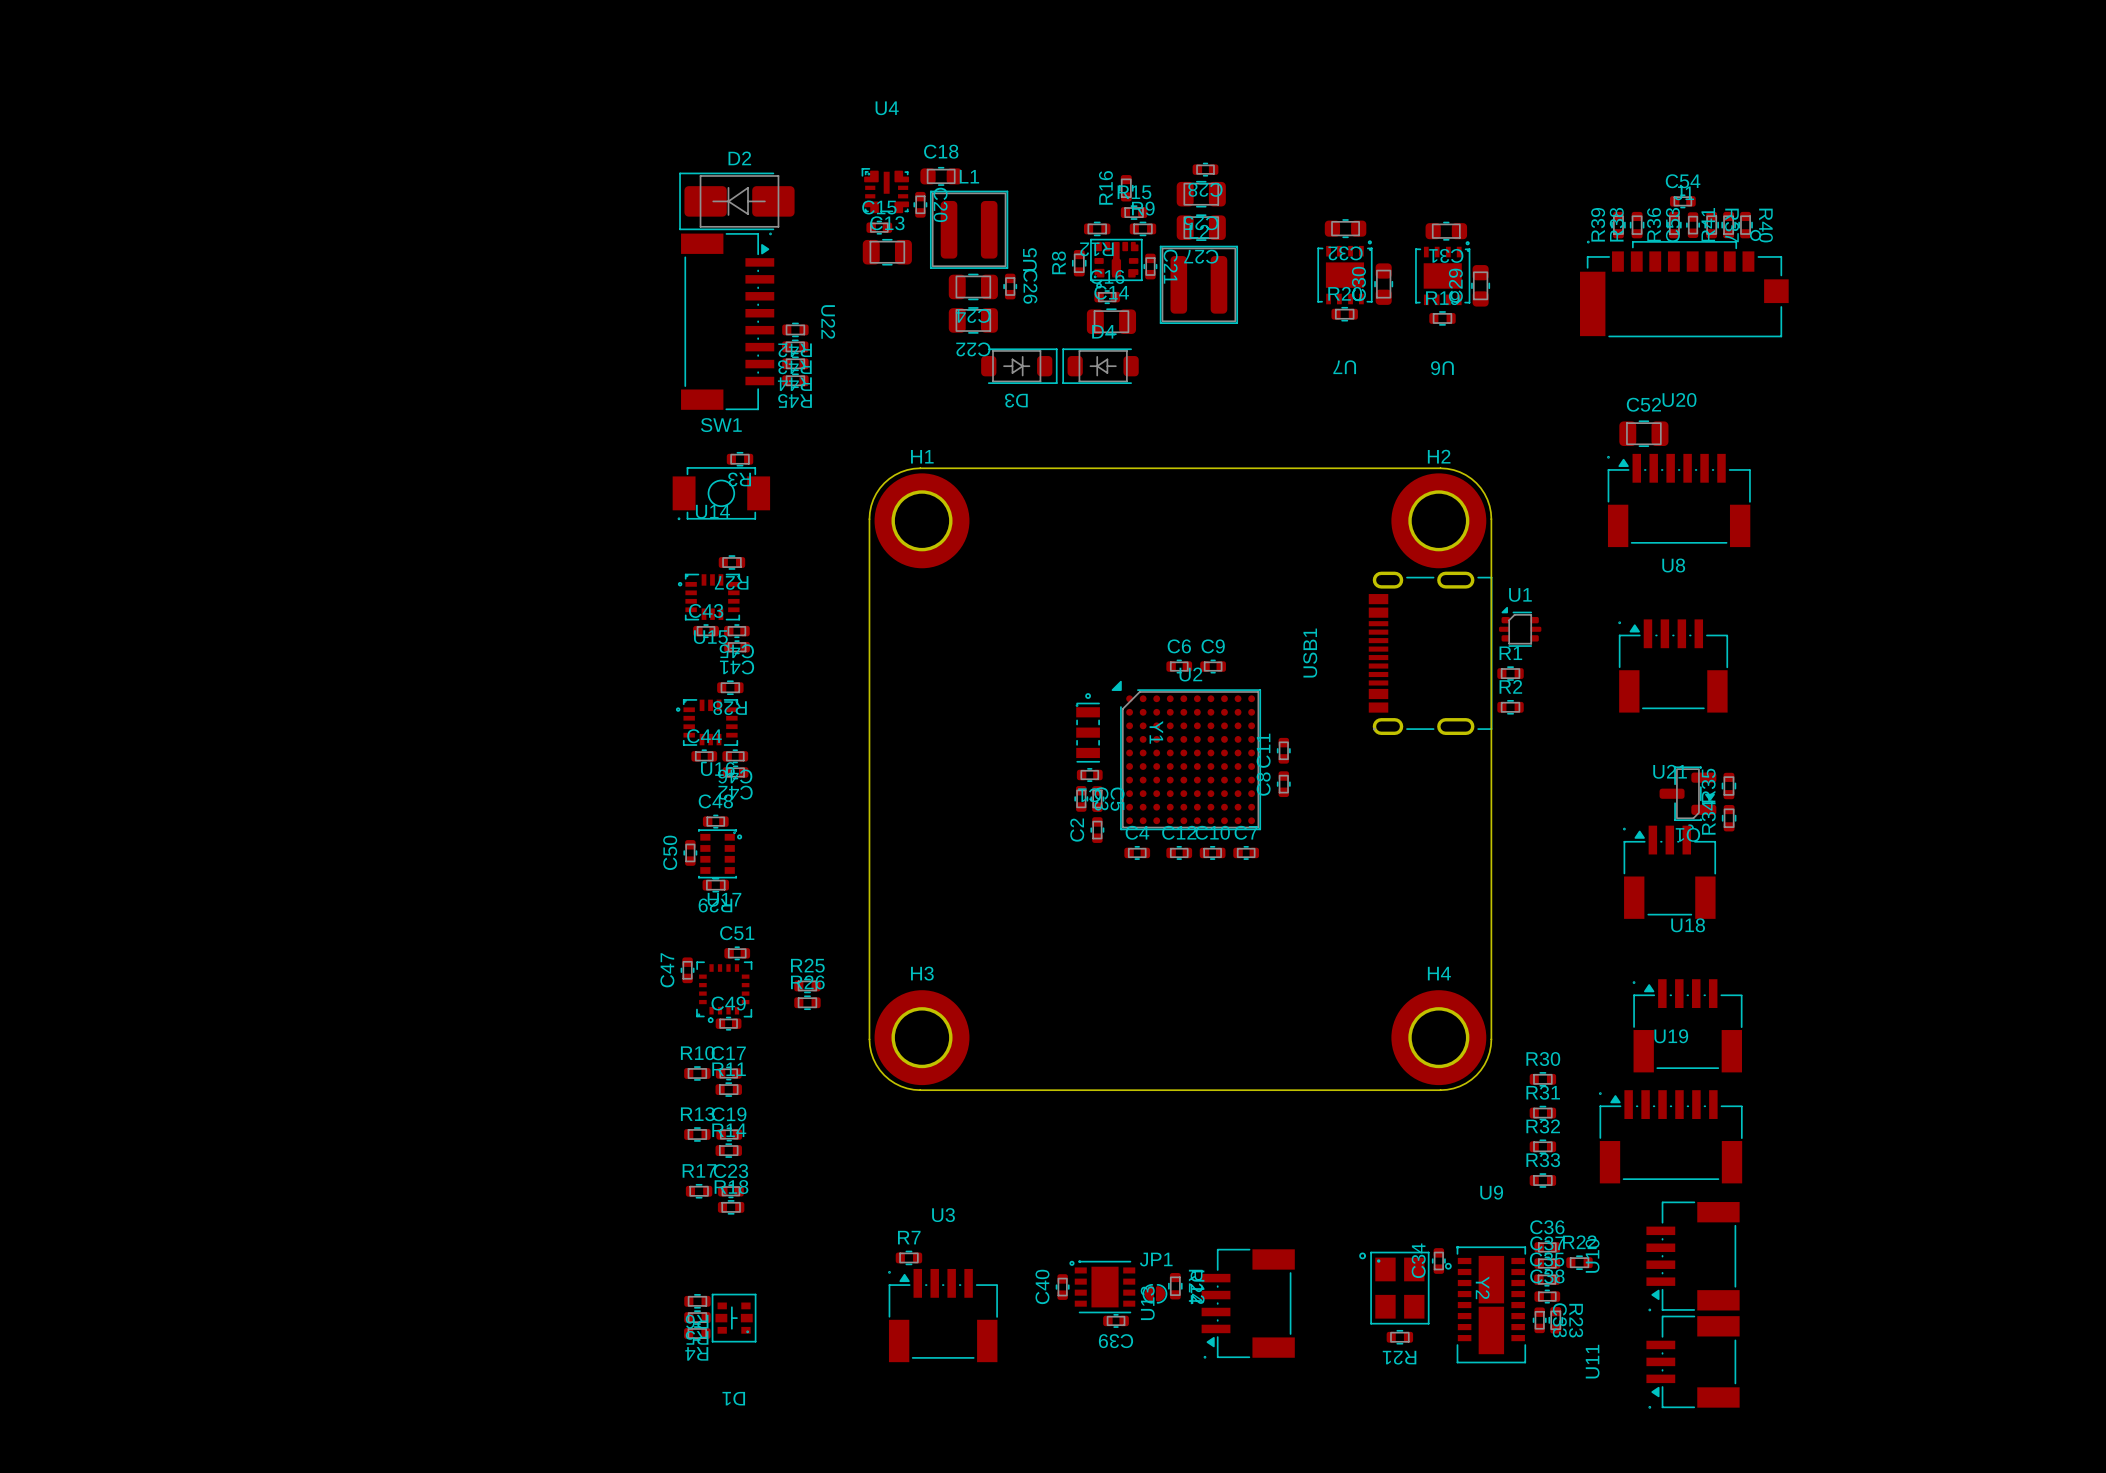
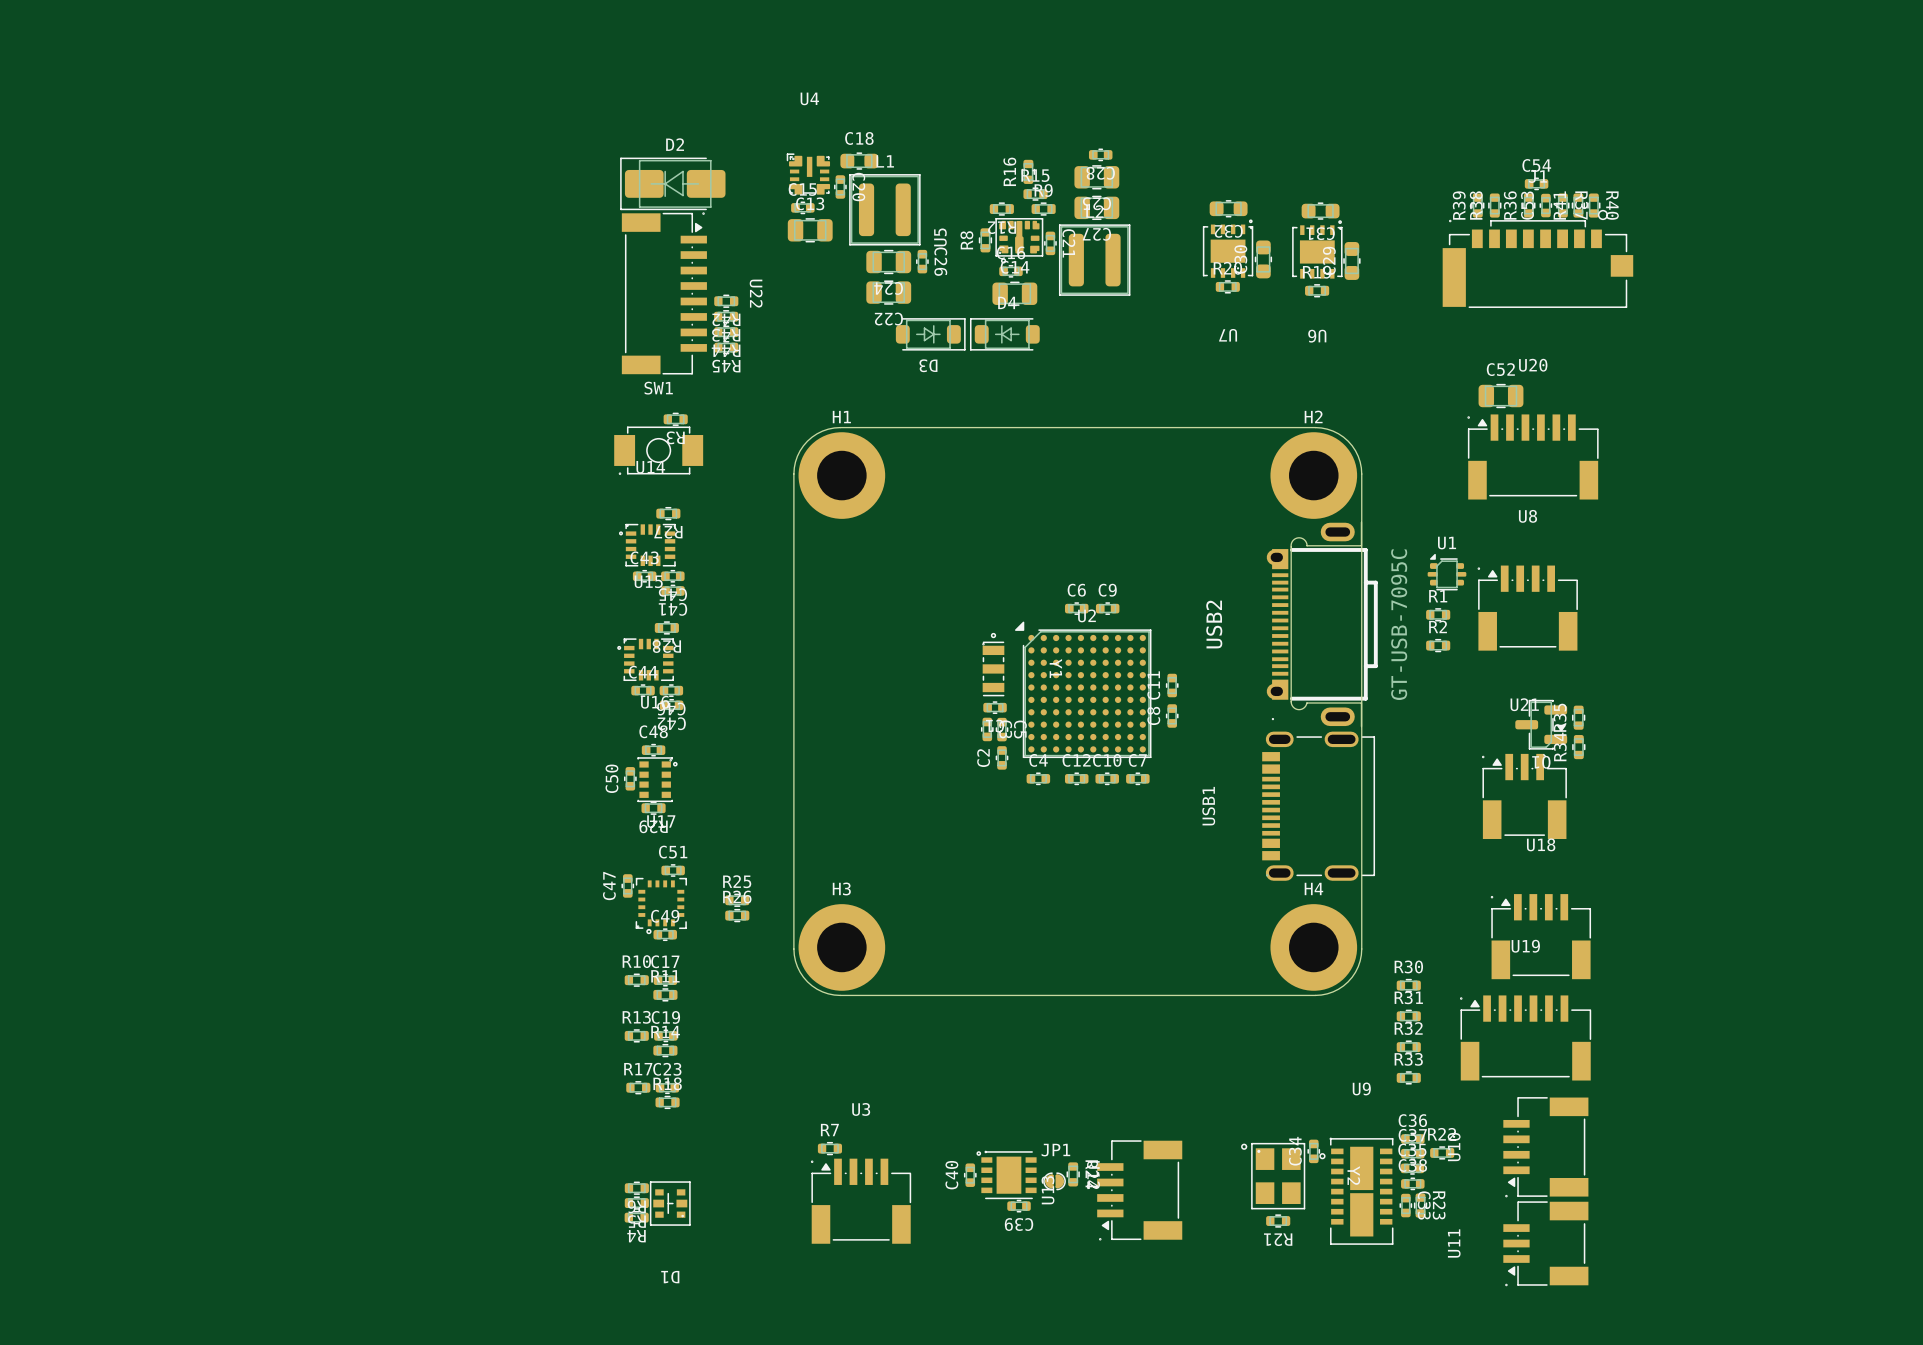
U1 position: (1520, 626) -> (1447, 572)
USB1 position: (1430, 653) -> (1318, 806)
R1 position: (1510, 673) -> (1438, 614)
USB2: none -> GT-USB-7095C (1322, 624)
R2 position: (1510, 707) -> (1438, 645)

